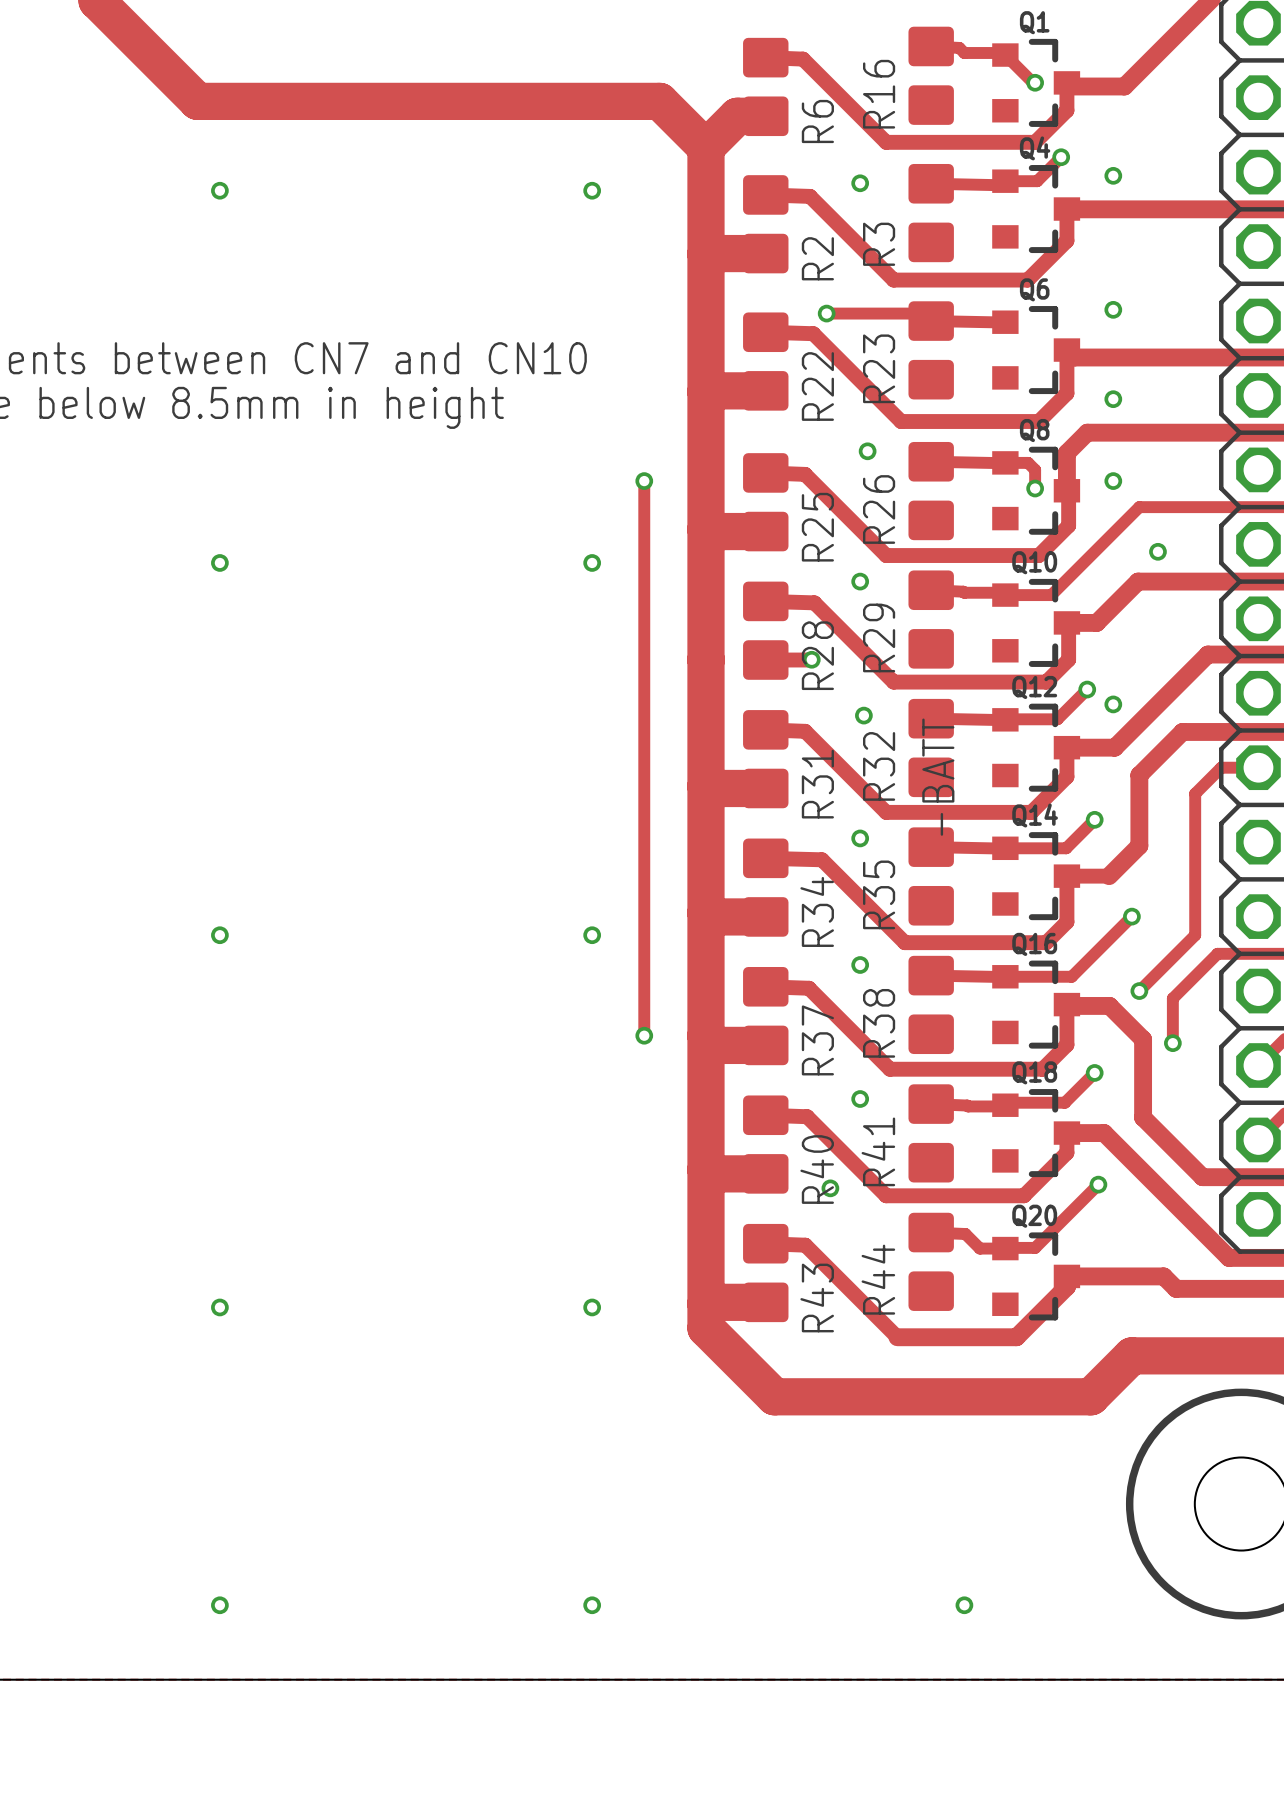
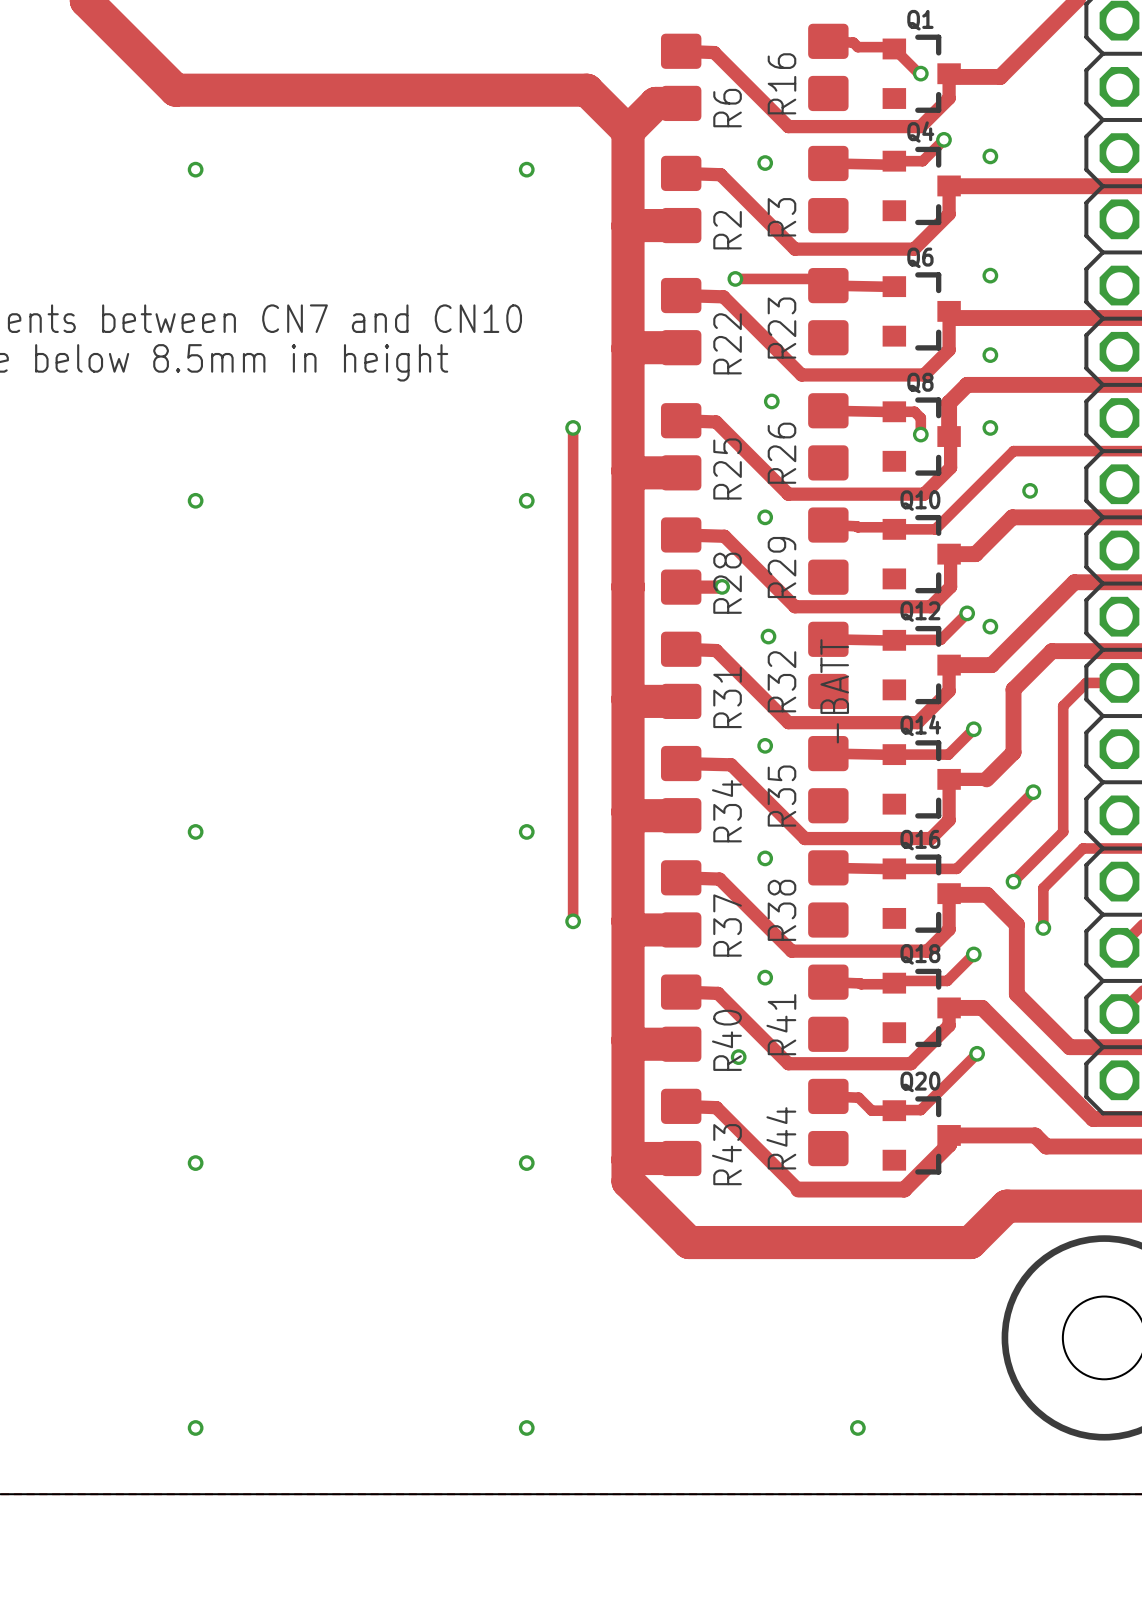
track: (1131, 916) (1071, 976) -> (1033, 792) (956, 868) (953, 868)
via position: (1131, 916) -> (1033, 792)

